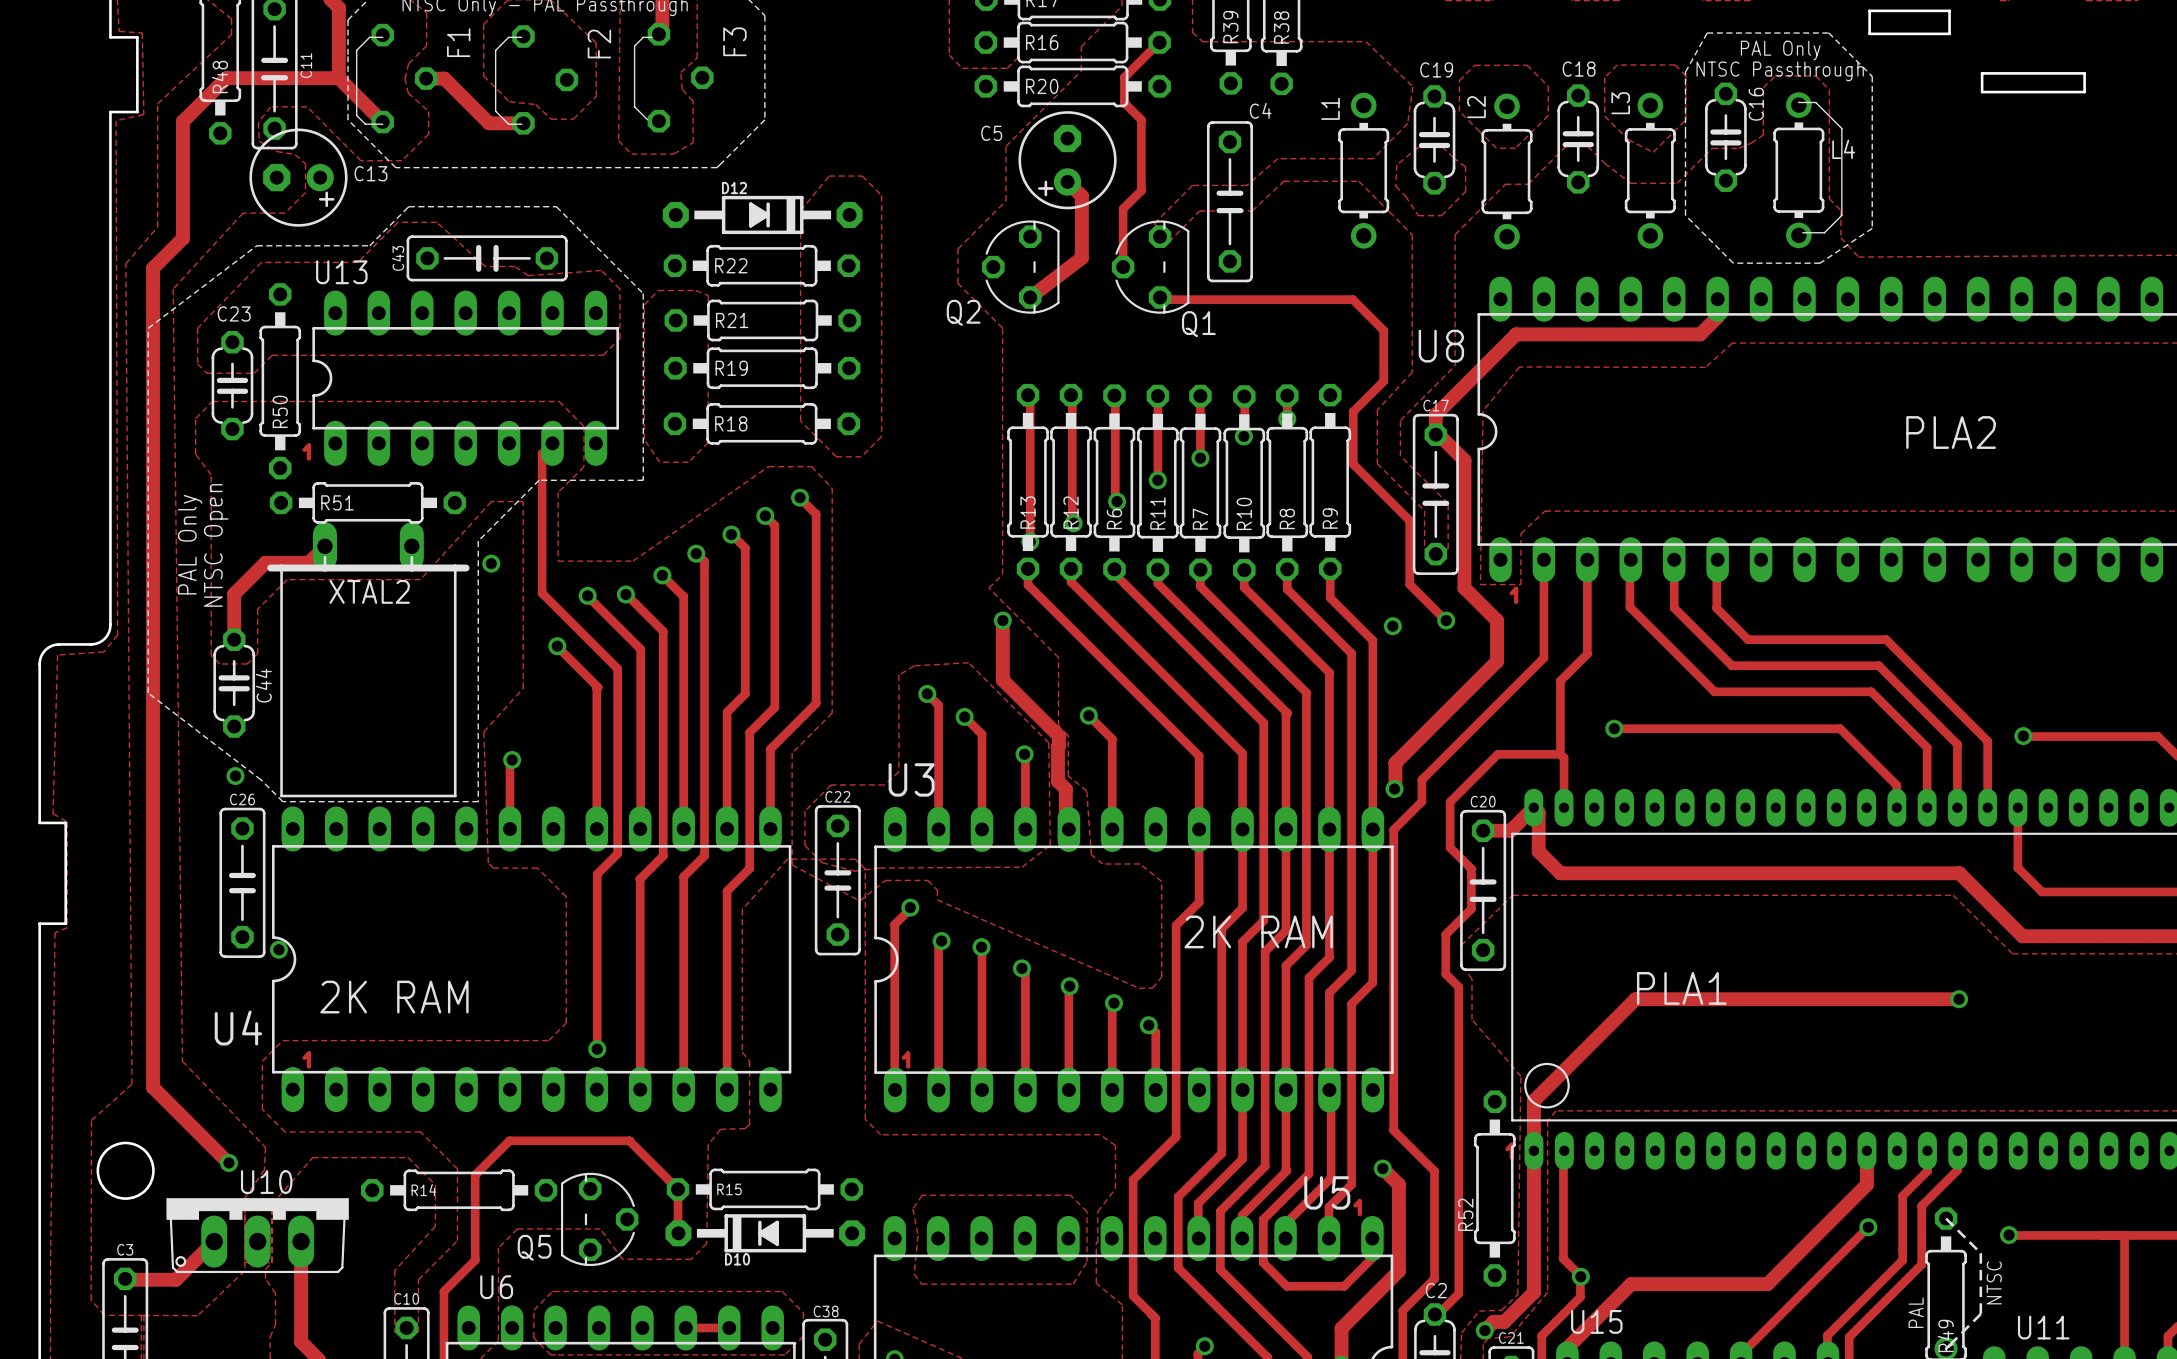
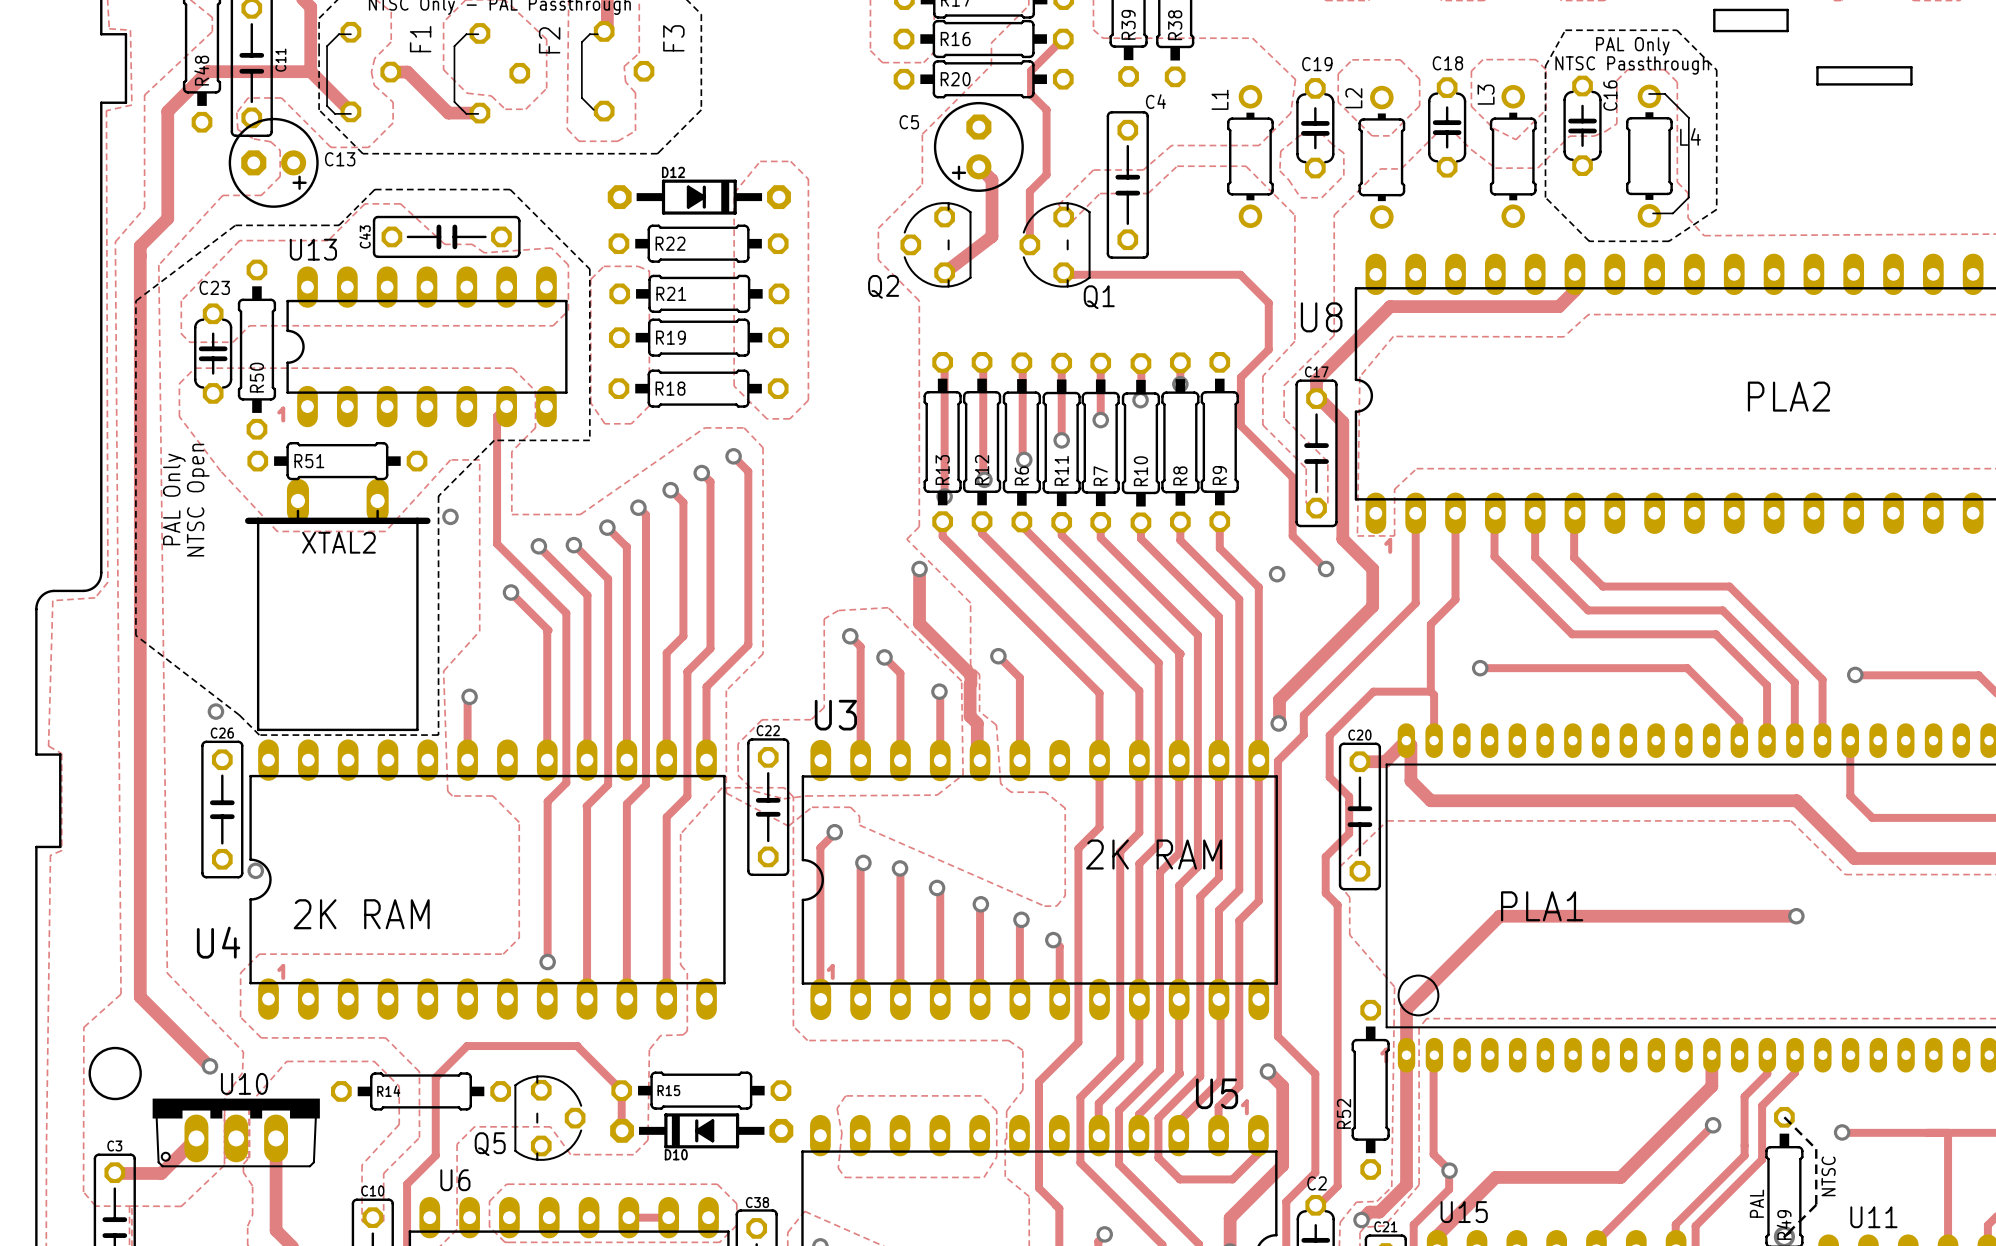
zone outline: (211, 474) (211, 655) (219, 663) (247, 663) (257, 653) (257, 609) (287, 579) (302, 579) -> (193, 435) (220, 471) (277, 531)
track: (324, 546) (308, 562) (265, 562) (234, 594) (234, 639) -> none
C44: (234, 683) -> none

